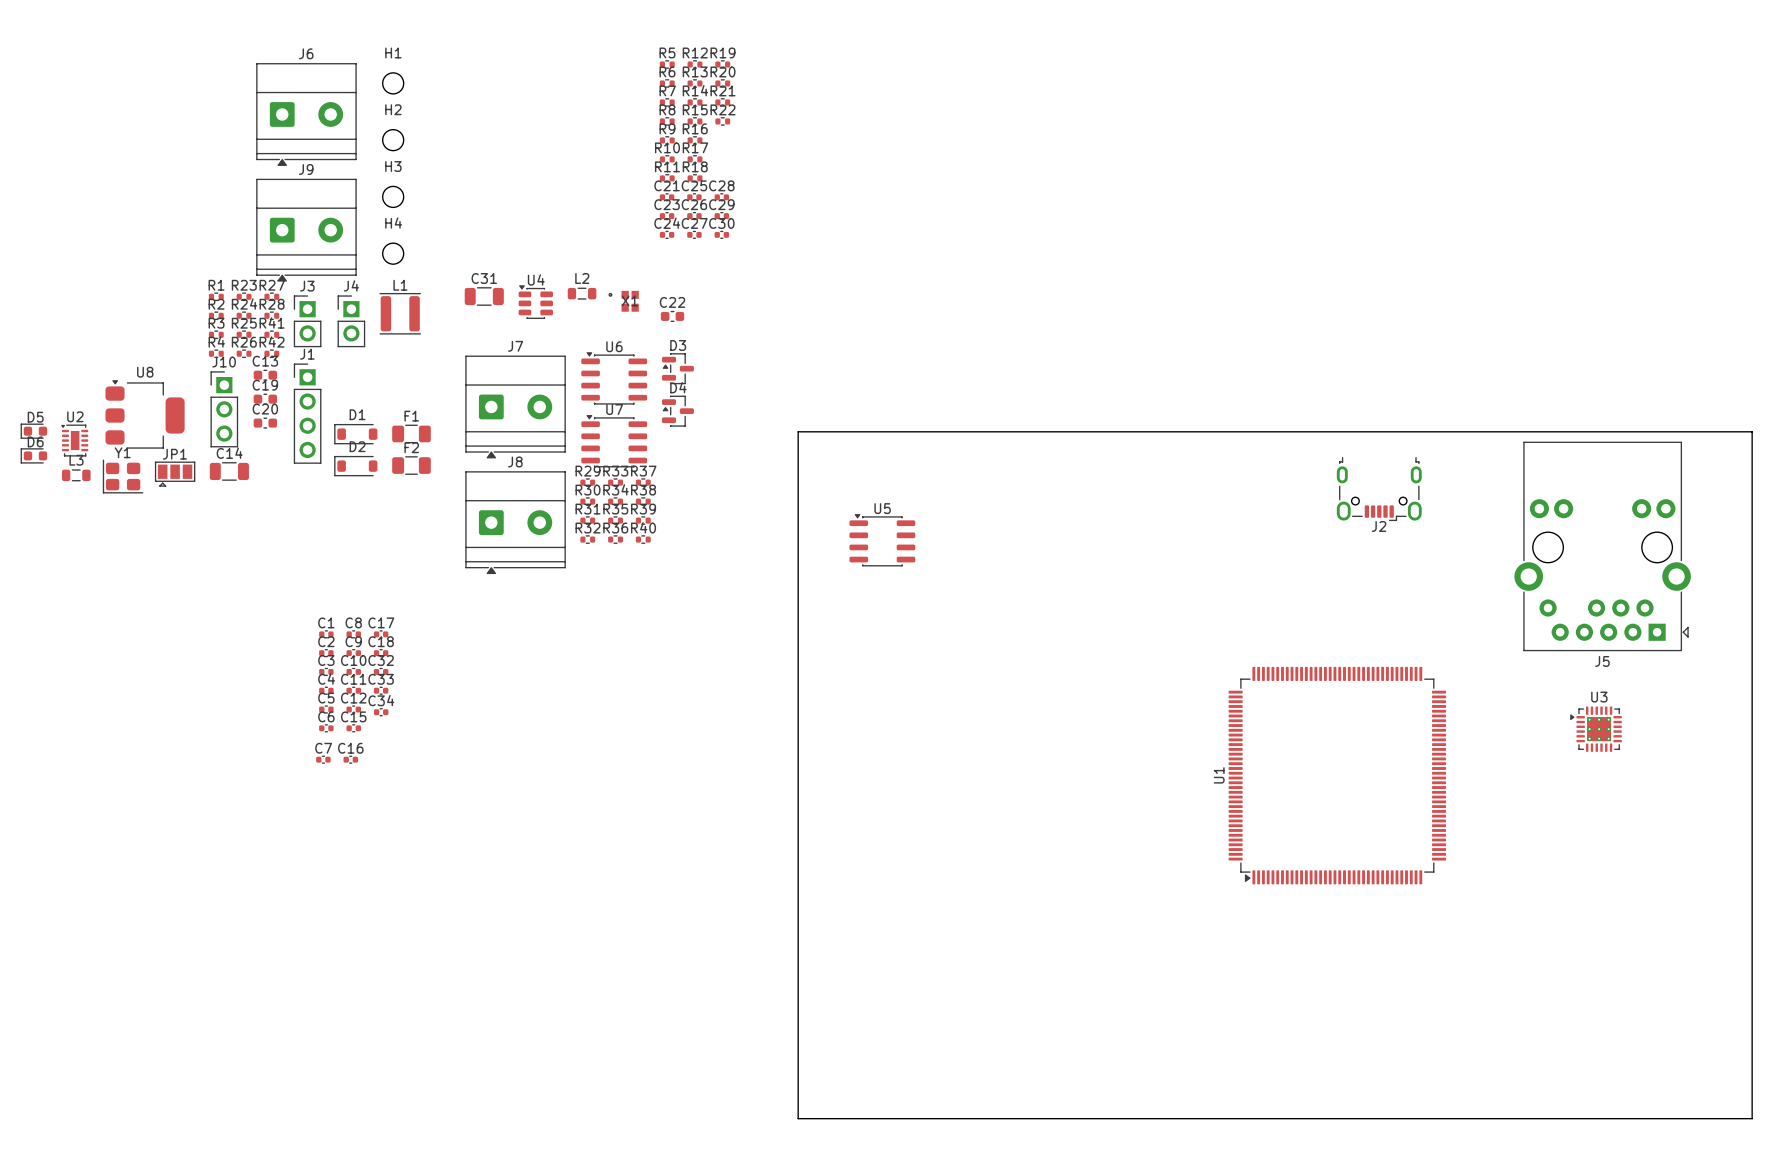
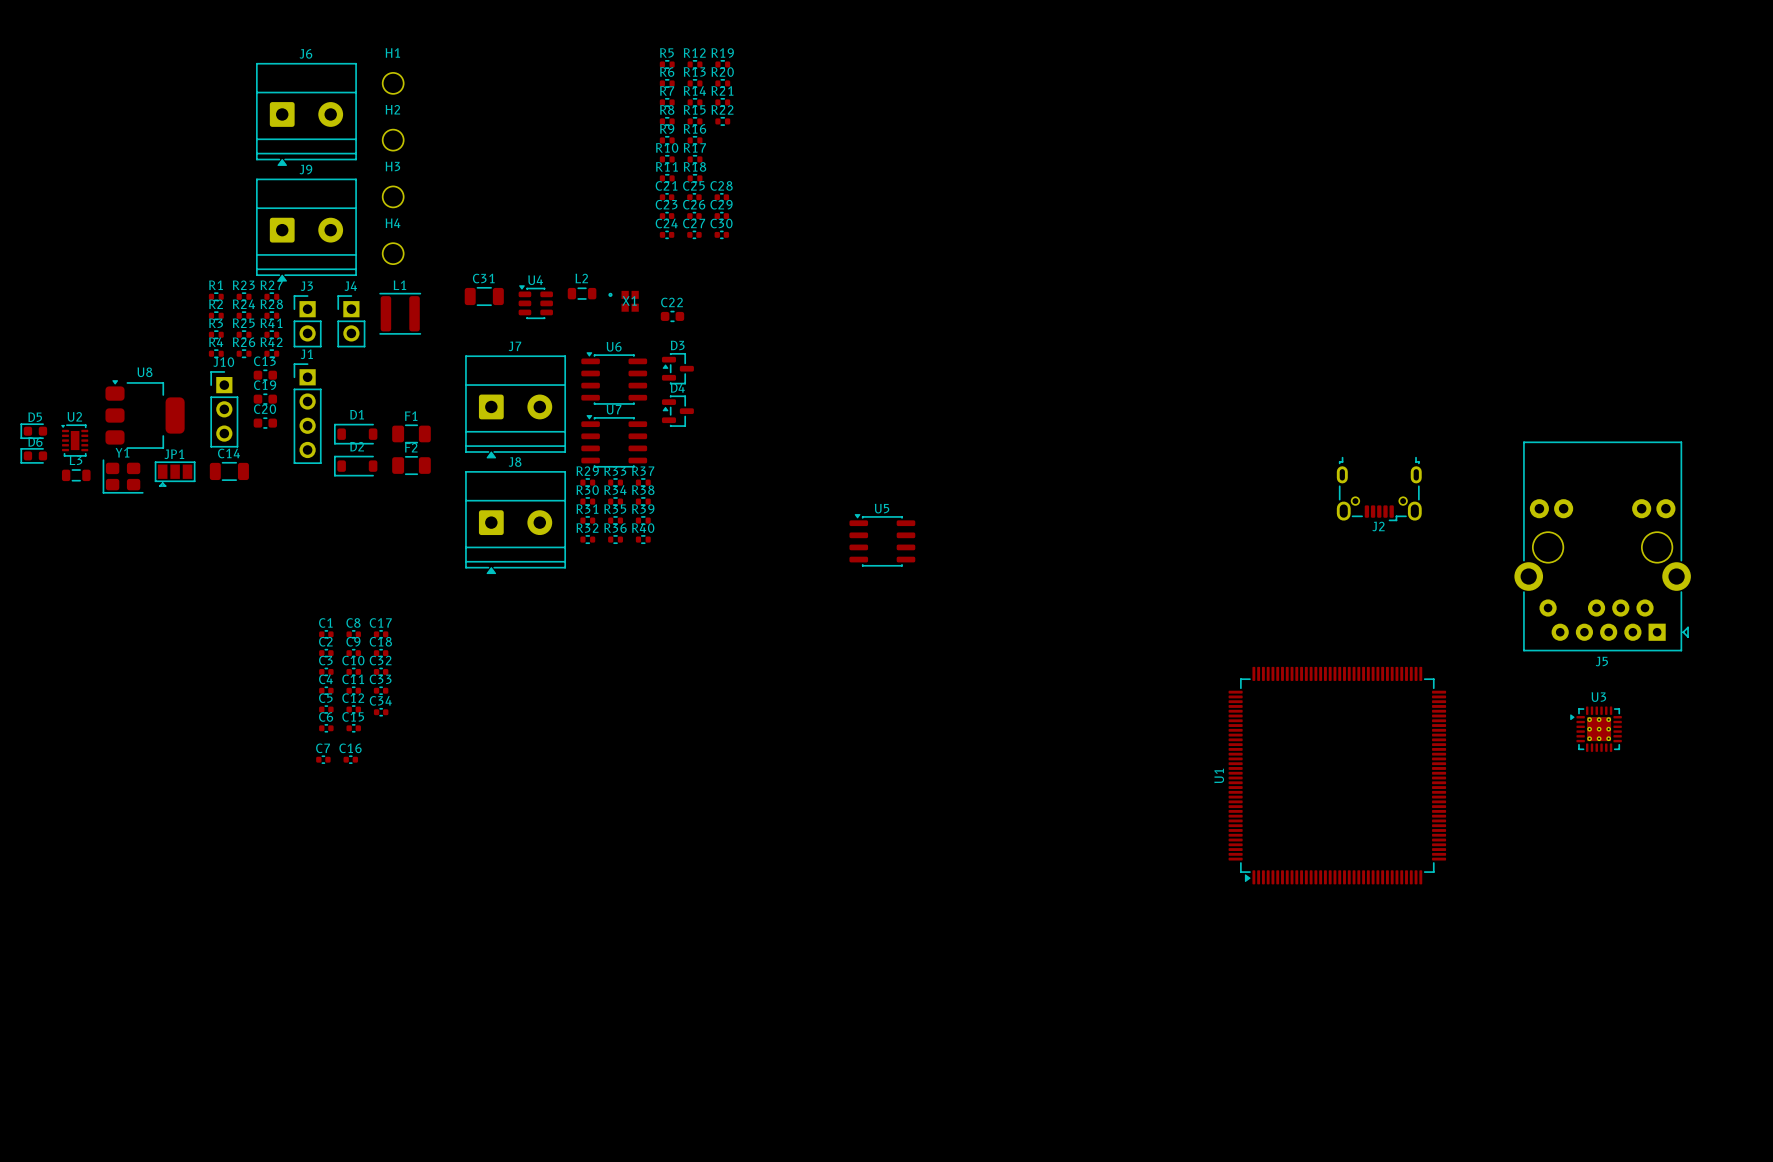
board edge: (798, 431) (798, 1118) (1752, 1118) (1752, 431) (798, 431) -> none

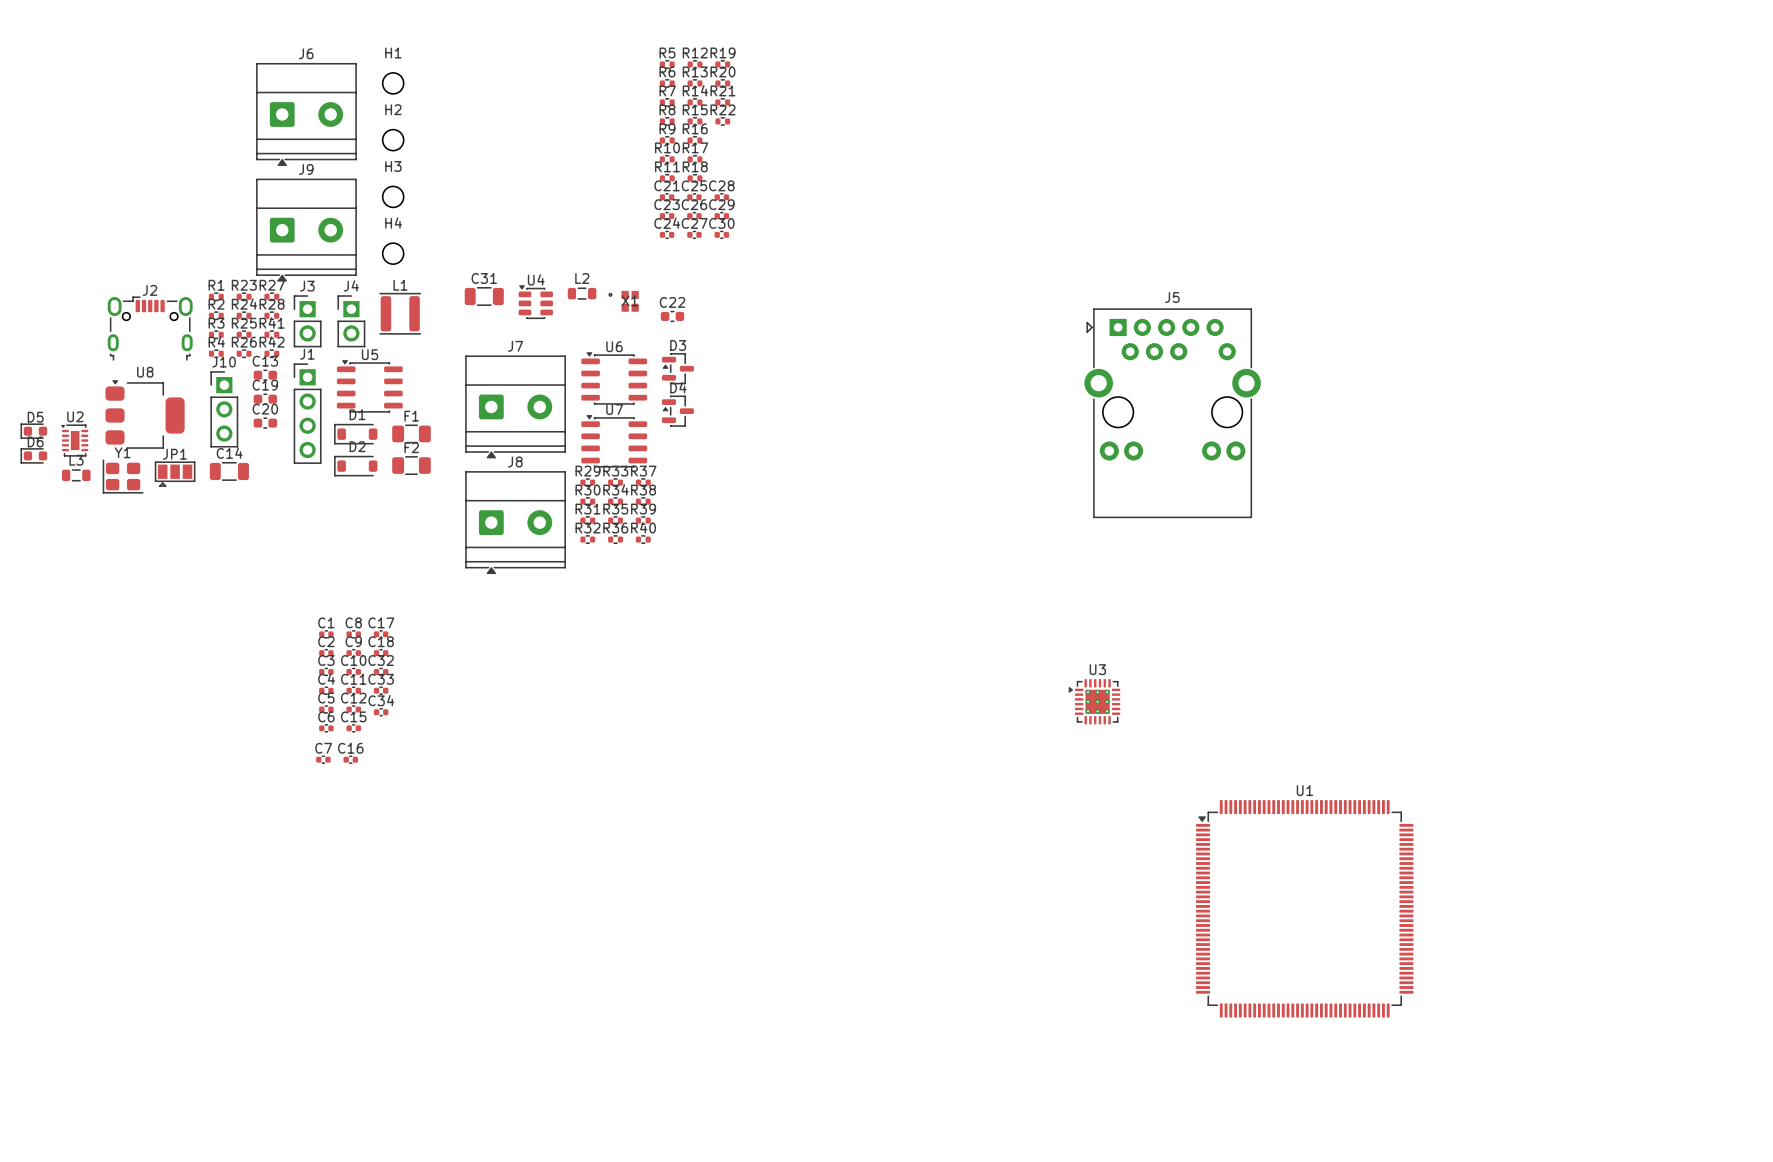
J2 rotation: 0° (1379, 489) -> 180° (150, 328)
J2 position: (1379, 489) -> (150, 328)
U5 position: (882, 540) -> (369, 386)
J5 rotation: 0° (1602, 546) -> 180° (1172, 413)
J5 position: (1602, 546) -> (1172, 413)
U3 position: (1596, 729) -> (1094, 701)
U1 rotation: 0° (1337, 775) -> 90° clockwise (1304, 908)
U1 position: (1337, 775) -> (1304, 908)

